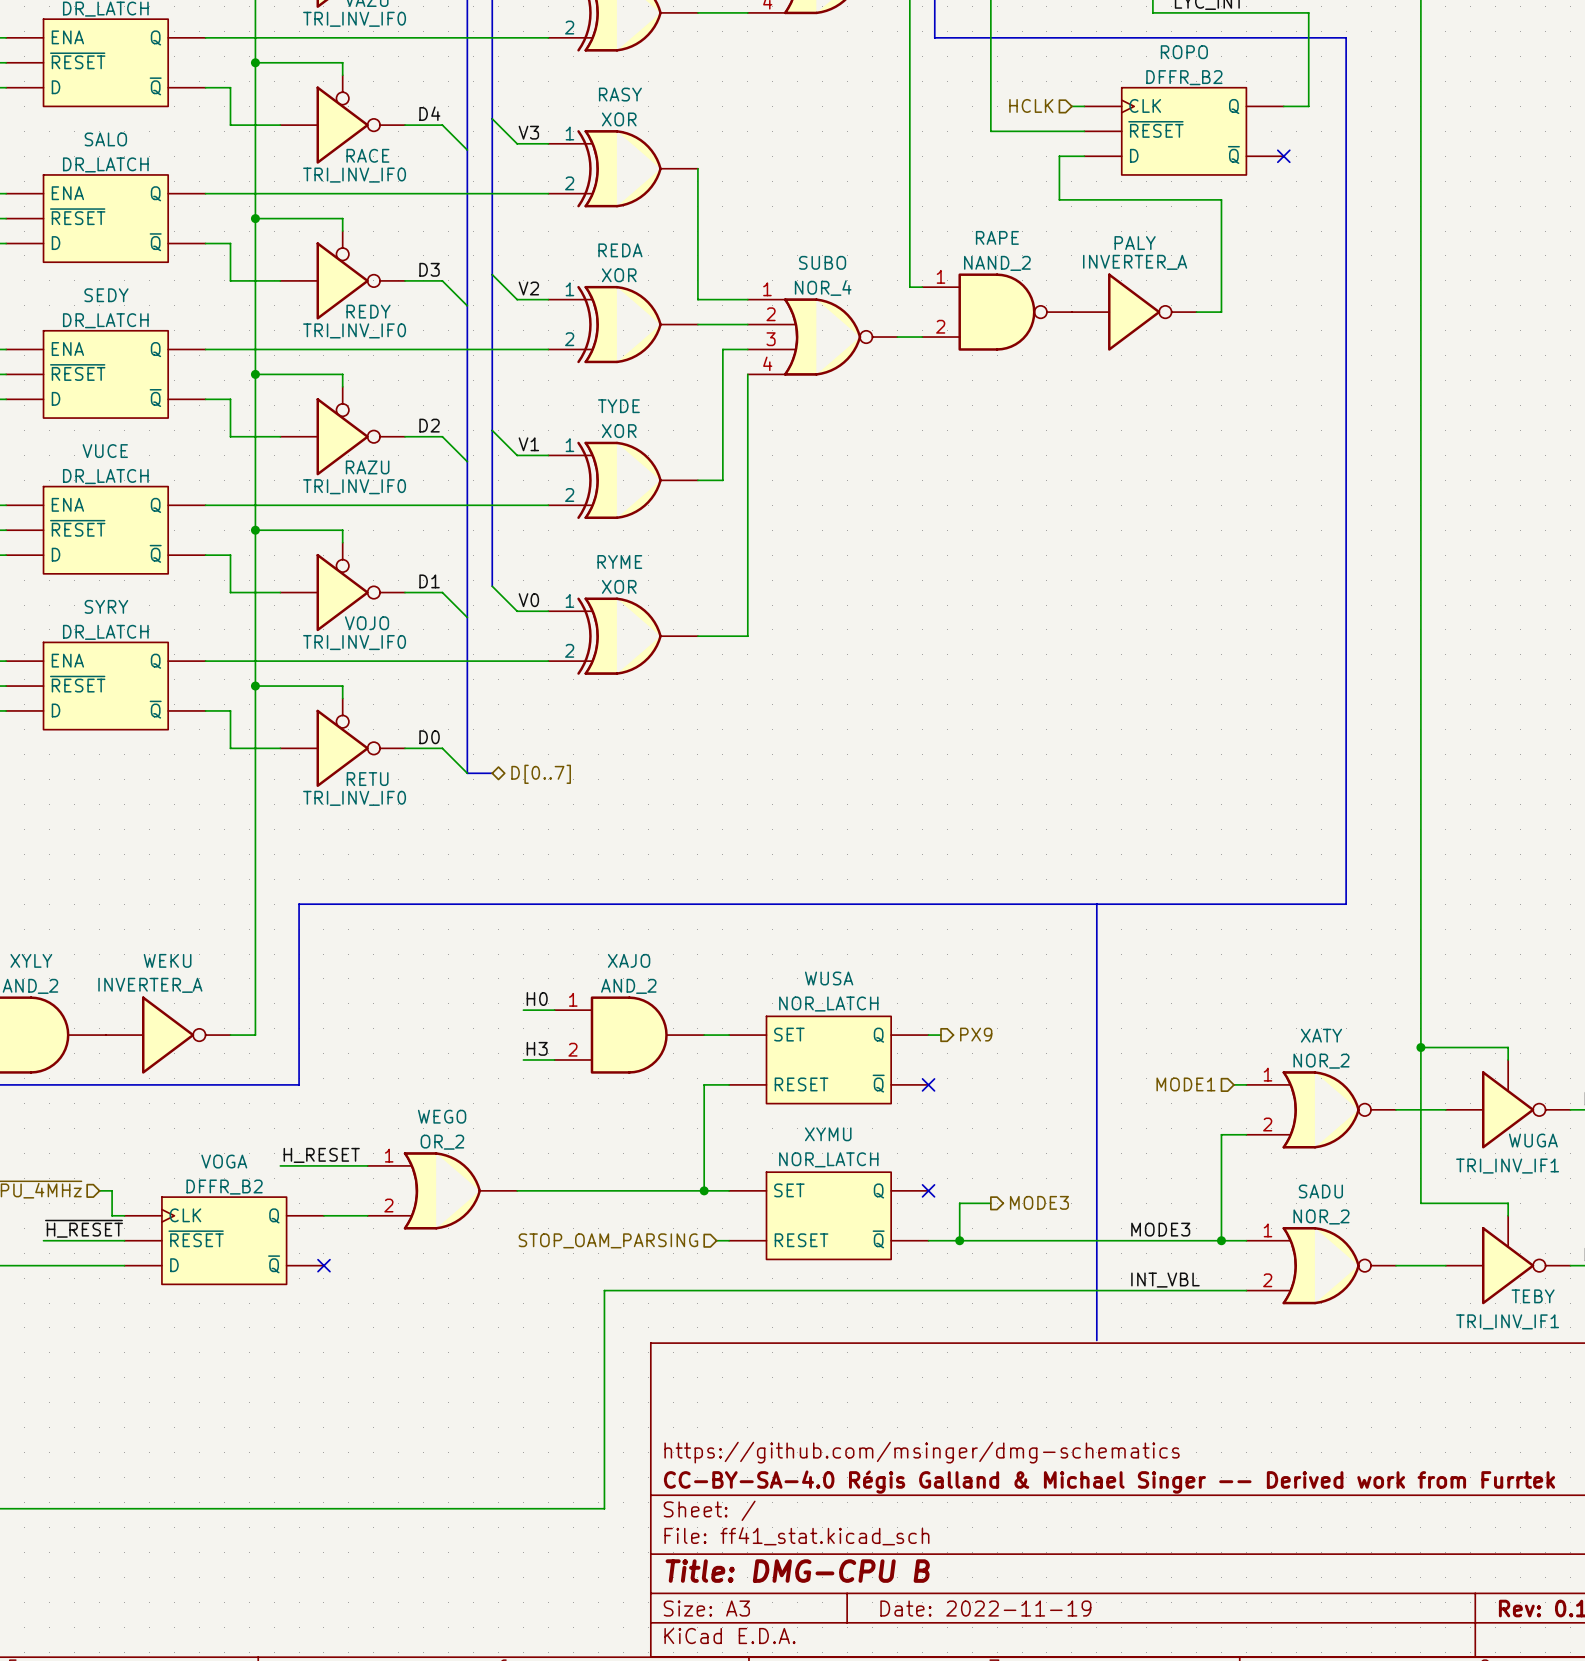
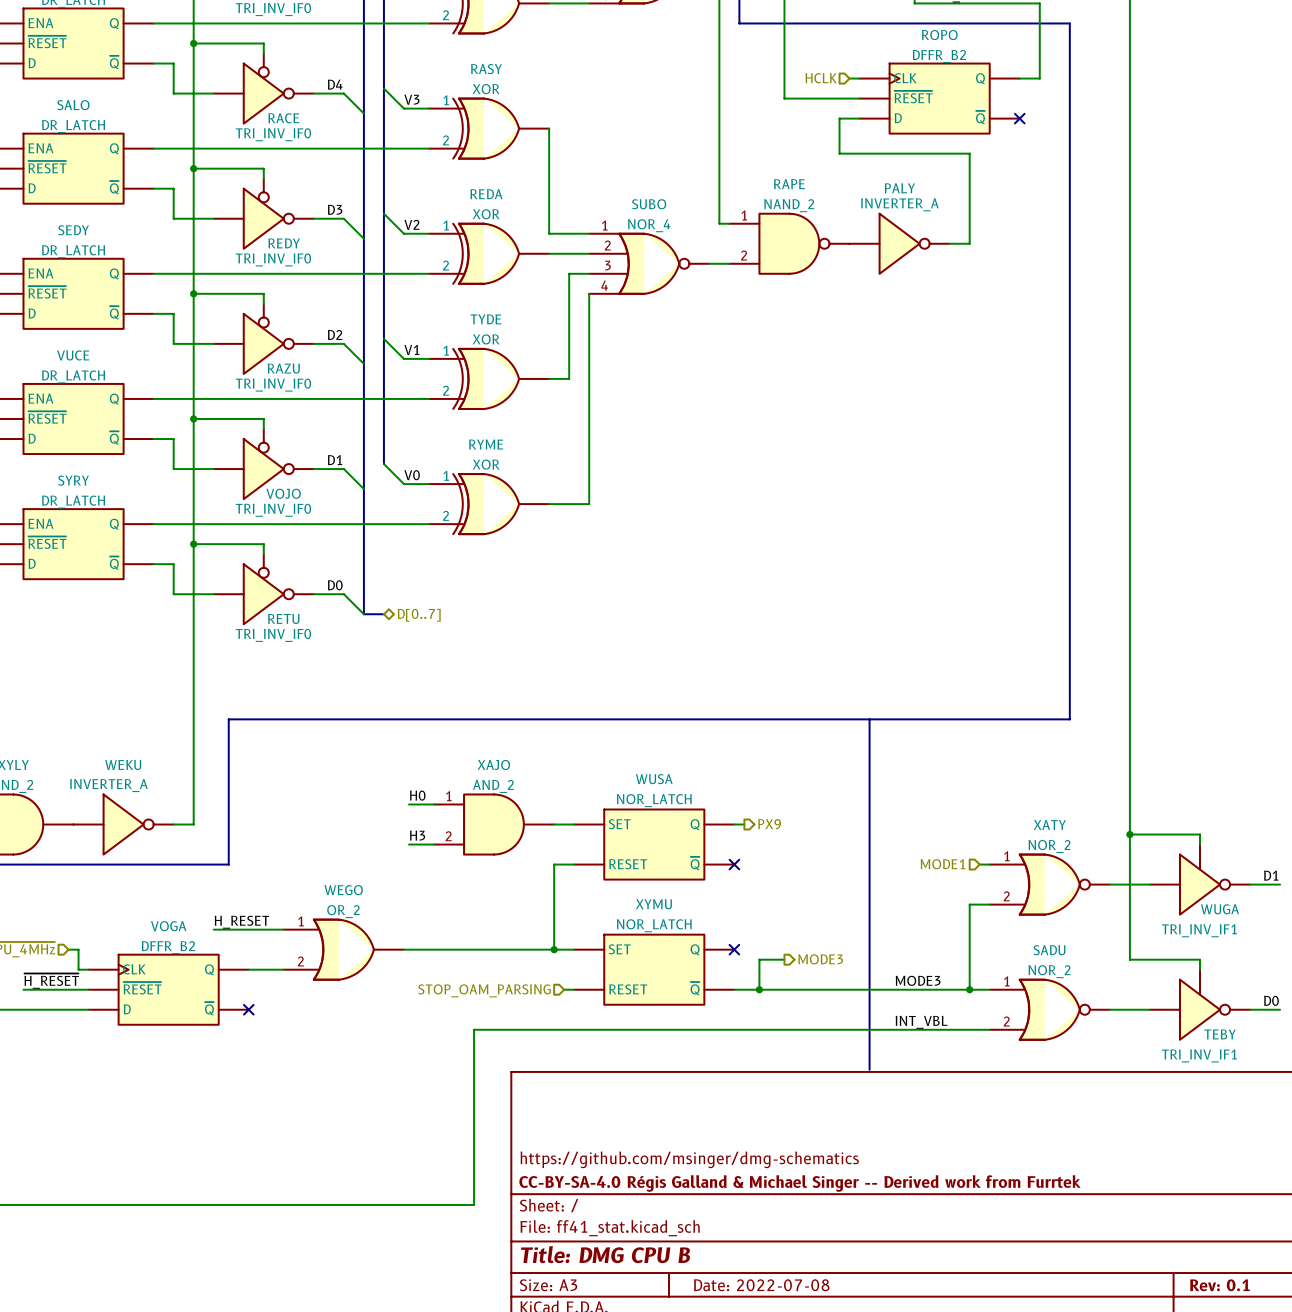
title block: Title: DMG-CPU B (797, 1571) -> Title: DMG CPU B (605, 1254)
title block: Date: 2022-11-19 (985, 1608) -> Date: 2022-07-08 (761, 1285)

